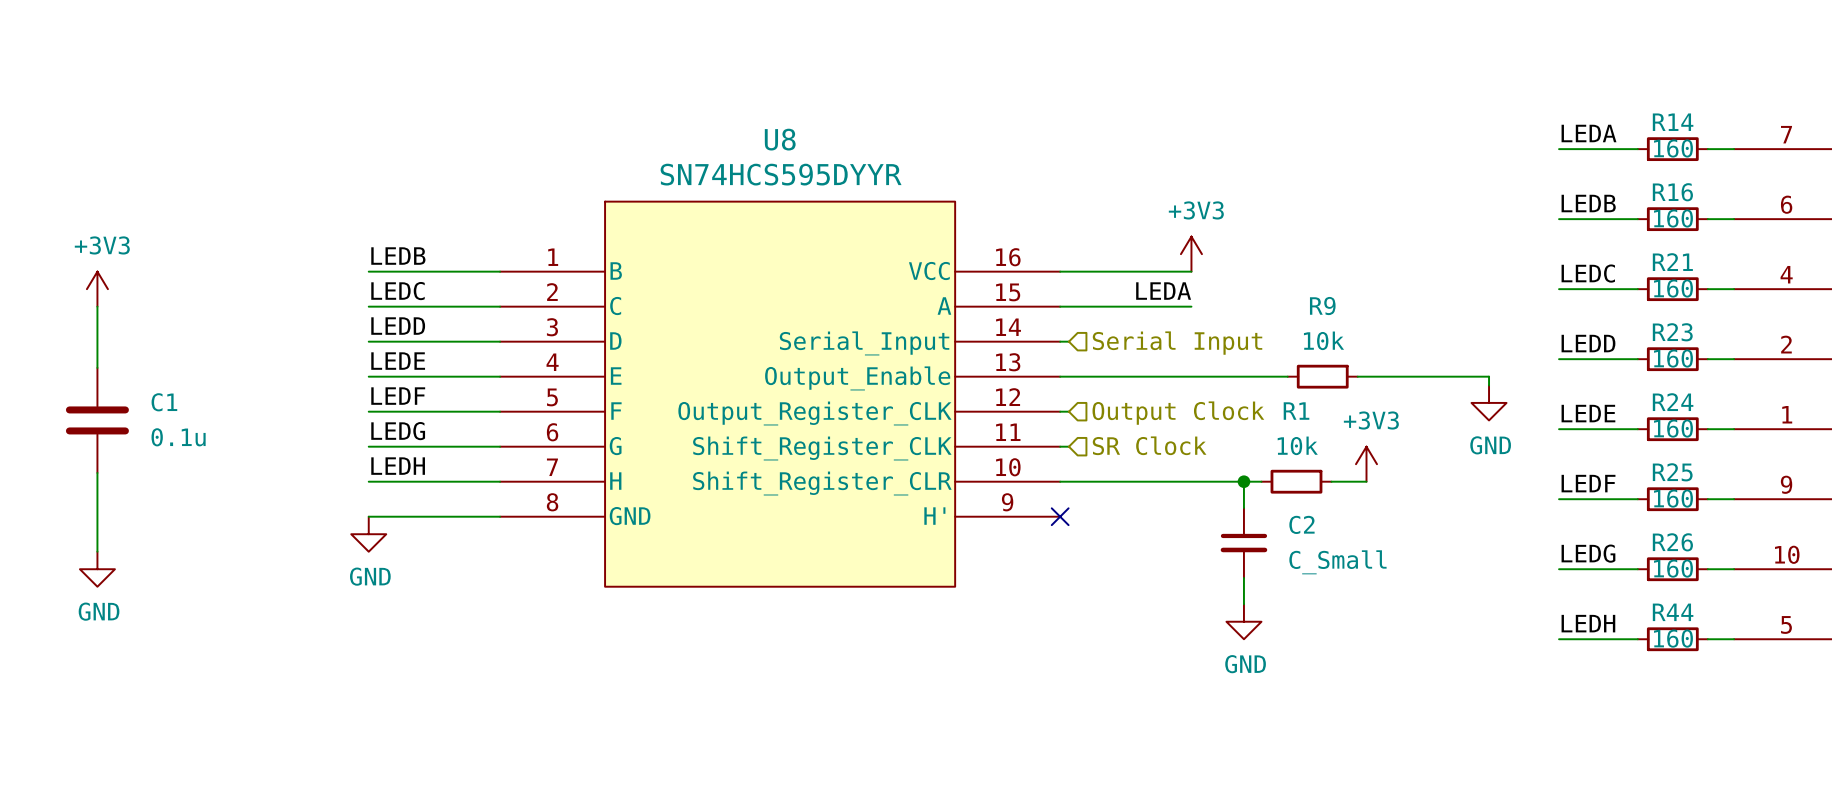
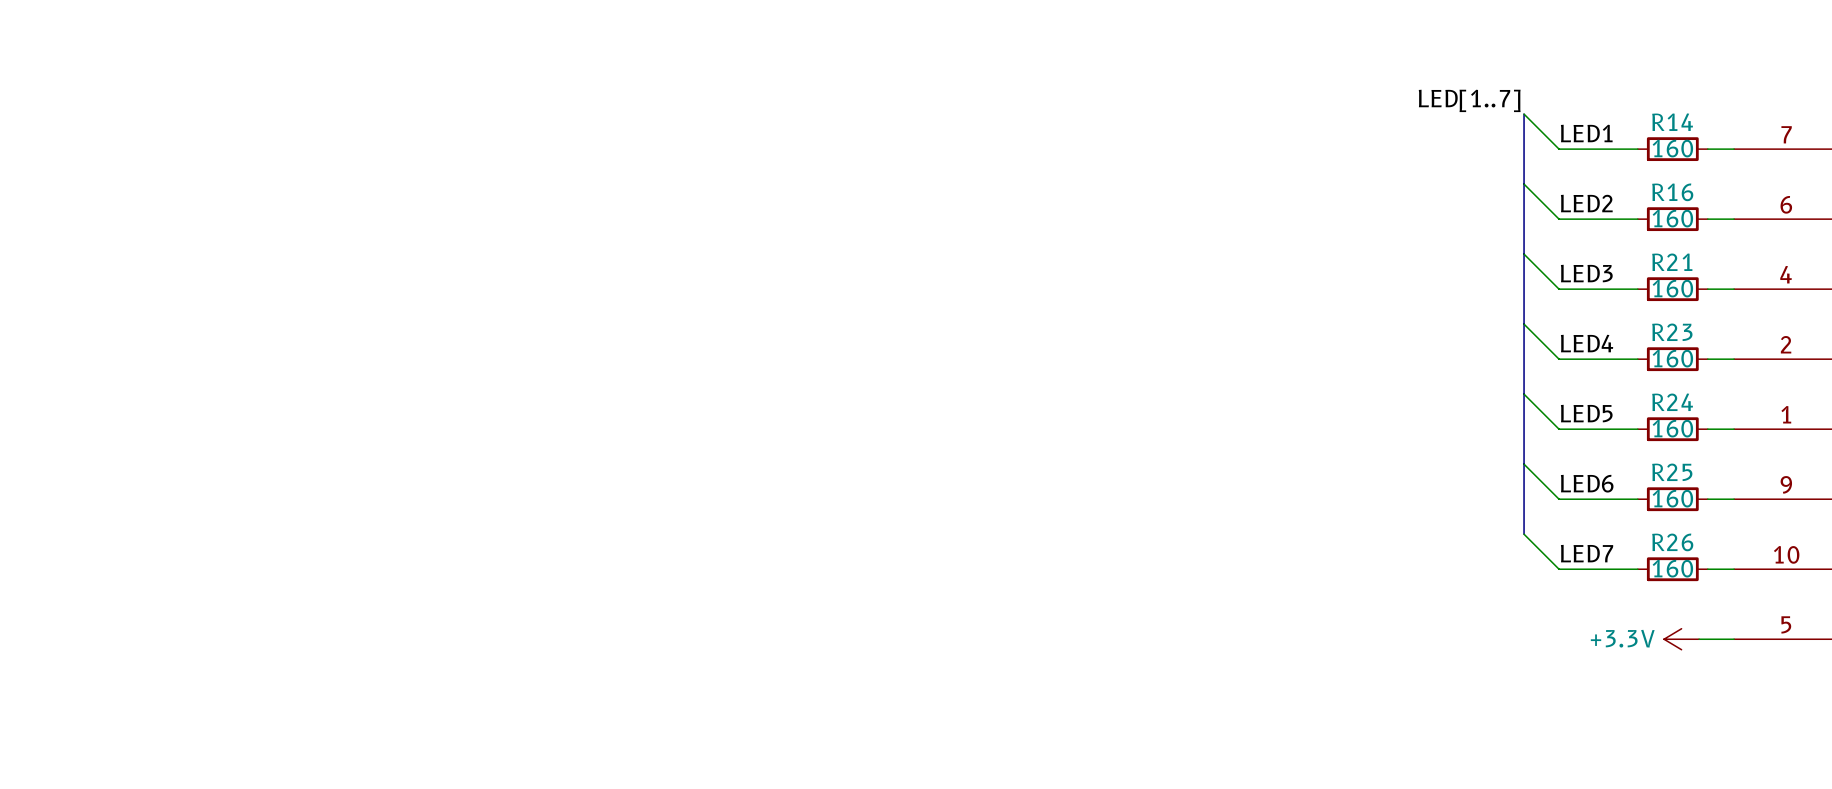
label: none -> LED[1..7] (1469, 100)
wire: none -> (1524, 114) (1559, 149)
bus: none -> (1524, 114) (1524, 534)
label: LEDA (1589, 133) -> LED1 (1586, 133)
wire: none -> (1524, 184) (1559, 219)
label: LEDB (1588, 203) -> LED2 (1586, 203)
power symbol: +3V3 (1191, 254) -> none
wire: none -> (1524, 254) (1559, 289)
label: LEDB (398, 256) -> none
wire: (368, 271) (500, 271) -> none
wire: (1060, 271) (1191, 271) -> none
label: LEDC (1588, 273) -> LED3 (1586, 273)
power symbol: +3V3 (97, 289) -> none
label: LEDC (397, 291) -> none
label: LEDA (1163, 291) -> none
wire: (97, 306) (97, 367) -> none
wire: (368, 306) (500, 306) -> none
wire: (1060, 306) (1191, 306) -> none
wire: none -> (1524, 324) (1559, 359)
label: LEDD (398, 326) -> none
wire: (368, 341) (500, 341) -> none
wire: (1060, 341) (1068, 341) -> none
hierarchical label: Serial Input (1177, 343) -> none
label: LEDD (1588, 343) -> LED4 (1587, 343)
label: LEDE (398, 361) -> none
wire: (368, 376) (500, 376) -> none
wire: (1060, 376) (1287, 376) -> none
R9: 10k (1322, 376) -> none
wire: (1357, 376) (1489, 376) (1489, 385) -> none
U8: SN74HCS595DYYR (780, 394) -> none
wire: none -> (1524, 394) (1559, 429)
label: LEDF (398, 396) -> none
power symbol: GND (1489, 402) -> none
wire: (368, 411) (500, 411) -> none
wire: (1060, 411) (1068, 411) -> none
hierarchical label: Output Clock (1178, 413) -> none
label: LEDE (1588, 413) -> LED5 (1586, 413)
C1: 0.1u (97, 420) -> none
label: LEDG (398, 431) -> none
hierarchical label: SR Clock (1149, 445) -> none
wire: (368, 446) (500, 446) -> none
wire: (1060, 446) (1068, 446) -> none
power symbol: +3V3 (1366, 464) -> none
wire: none -> (1524, 464) (1559, 499)
label: LEDH (398, 466) -> none
wire: (97, 472) (97, 551) -> none
wire: (368, 481) (500, 481) -> none
wire: (1060, 481) (1261, 481) -> none
wire: (1243, 481) (1243, 507) -> none
junction: (1243, 481) -> none
R1: 10k (1296, 481) -> none
wire: (1331, 481) (1366, 481) -> none
label: LEDF (1588, 483) -> LED6 (1587, 483)
wire: (368, 516) (500, 516) -> none
no-connect mark: (1060, 516) -> none
power symbol: GND (368, 534) -> none
wire: none -> (1524, 534) (1559, 569)
C2: C_Small (1243, 542) -> none
label: LEDG (1588, 553) -> LED7 (1587, 553)
power symbol: GND (97, 569) -> none
wire: (1243, 577) (1243, 604) -> none
power symbol: GND (1243, 621) -> none
label: LEDH (1588, 623) -> none
wire: (1559, 639) (1637, 639) -> none
R44: 160 (1672, 639) -> none
power symbol: none -> +3.3V (1681, 639)

